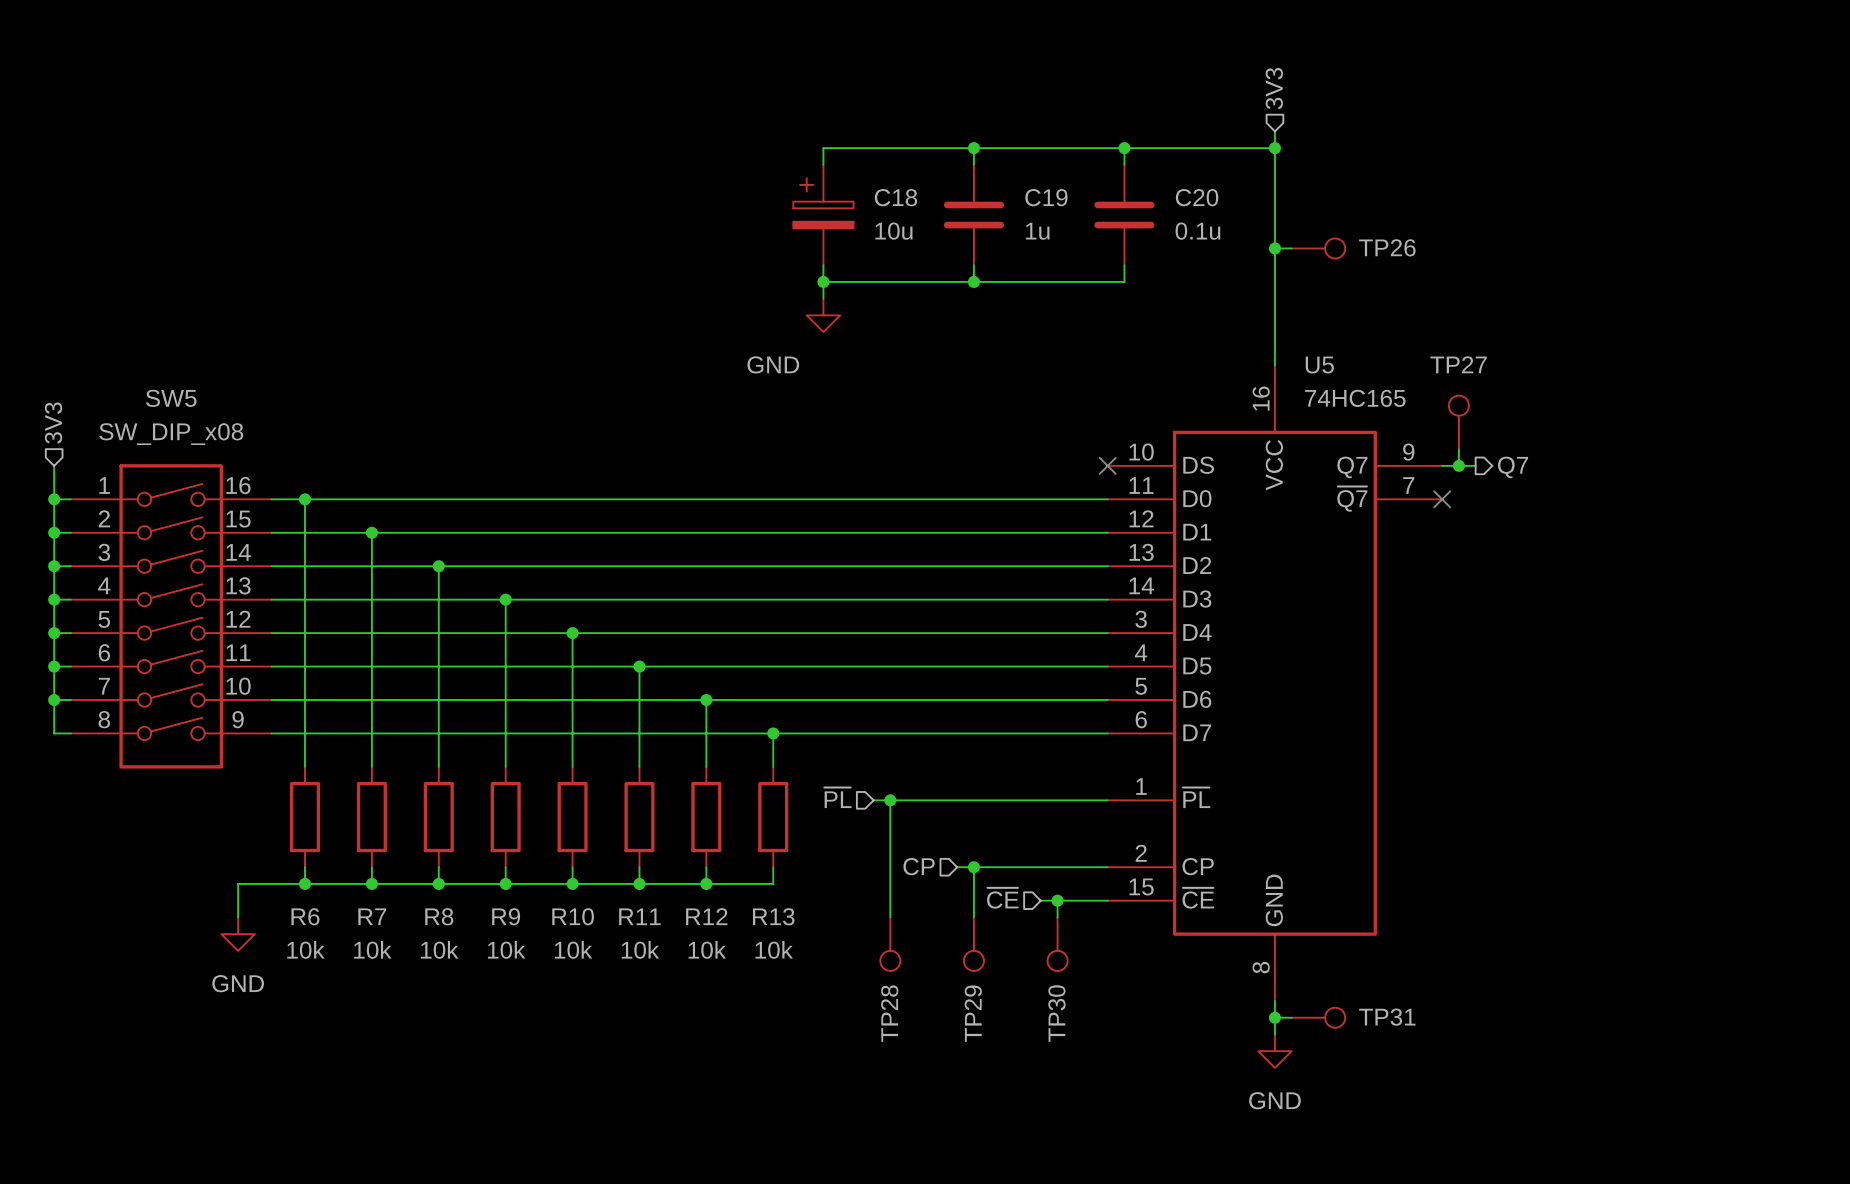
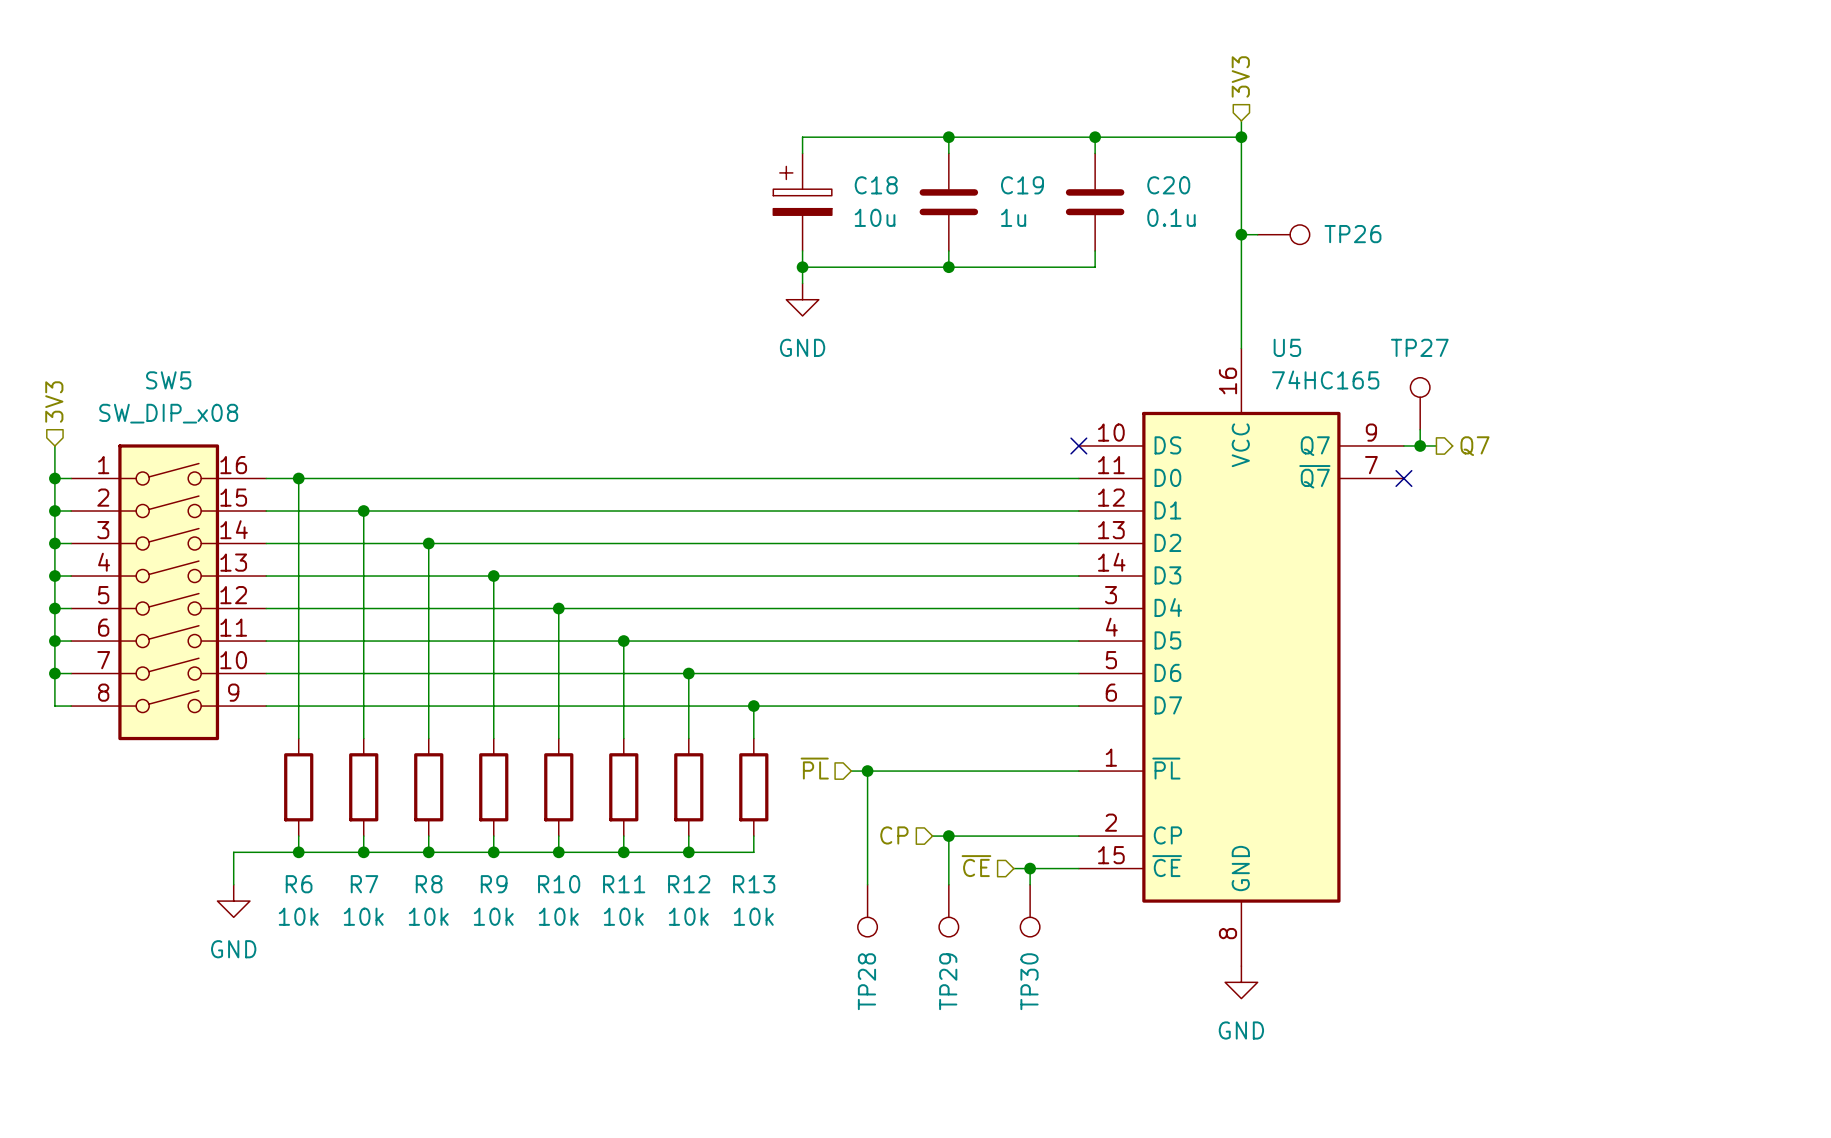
power symbol text position: GND (773, 364) -> GND (802, 347)
junction: (1274, 1017) -> none
TP31: (1318, 1017) -> none
power symbol position: GND (1274, 1051) -> GND (1241, 982)

